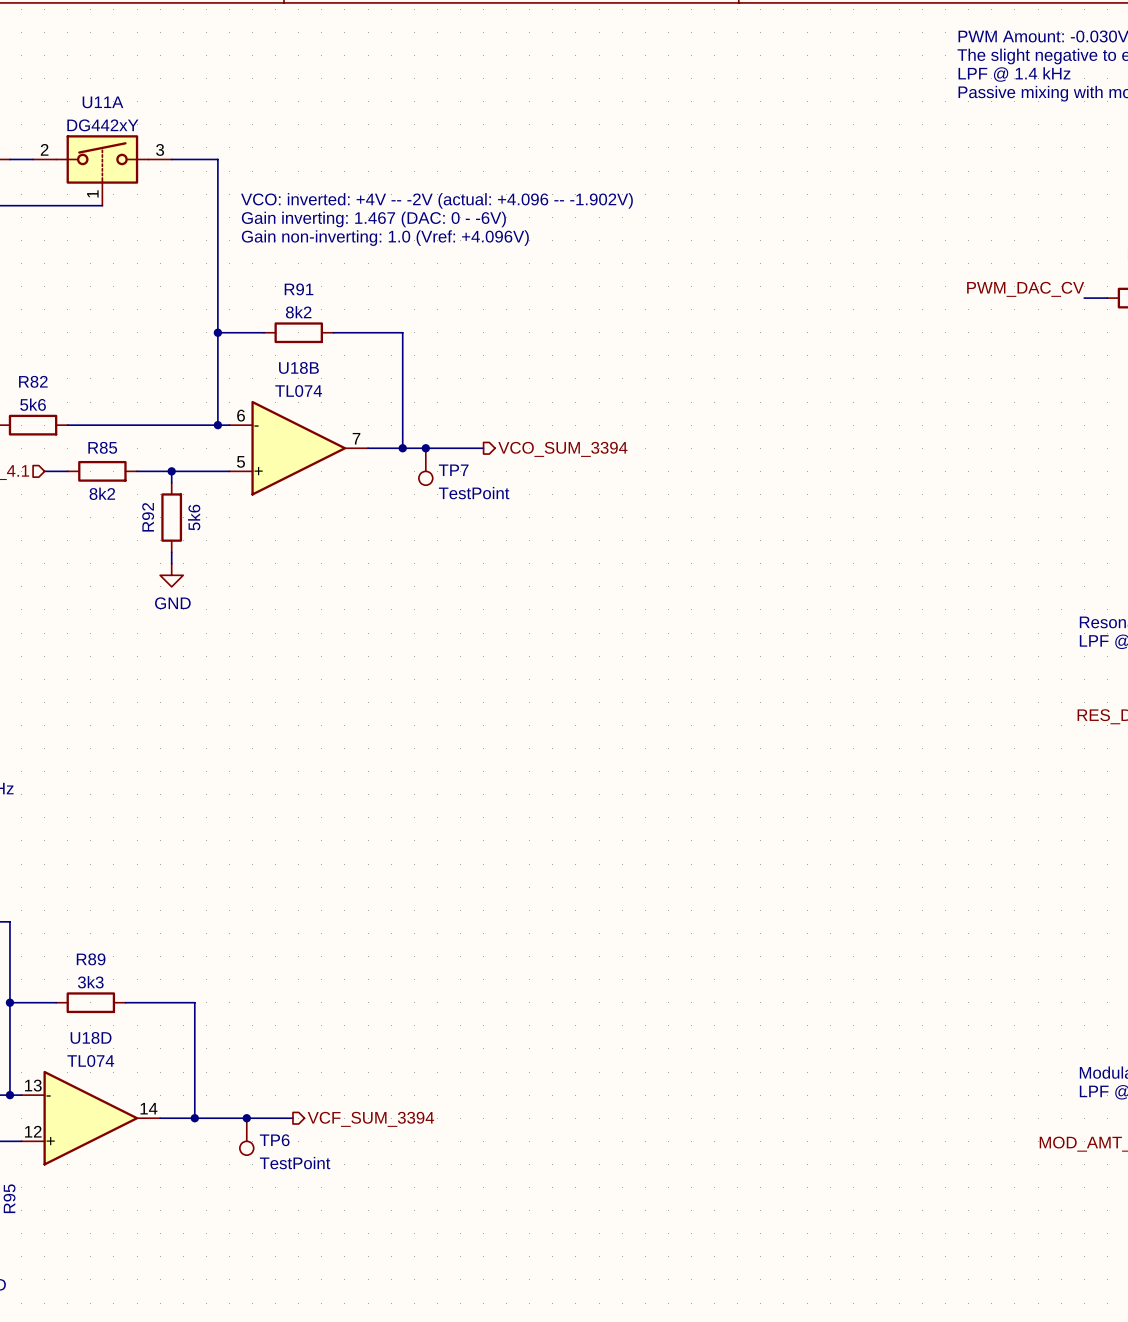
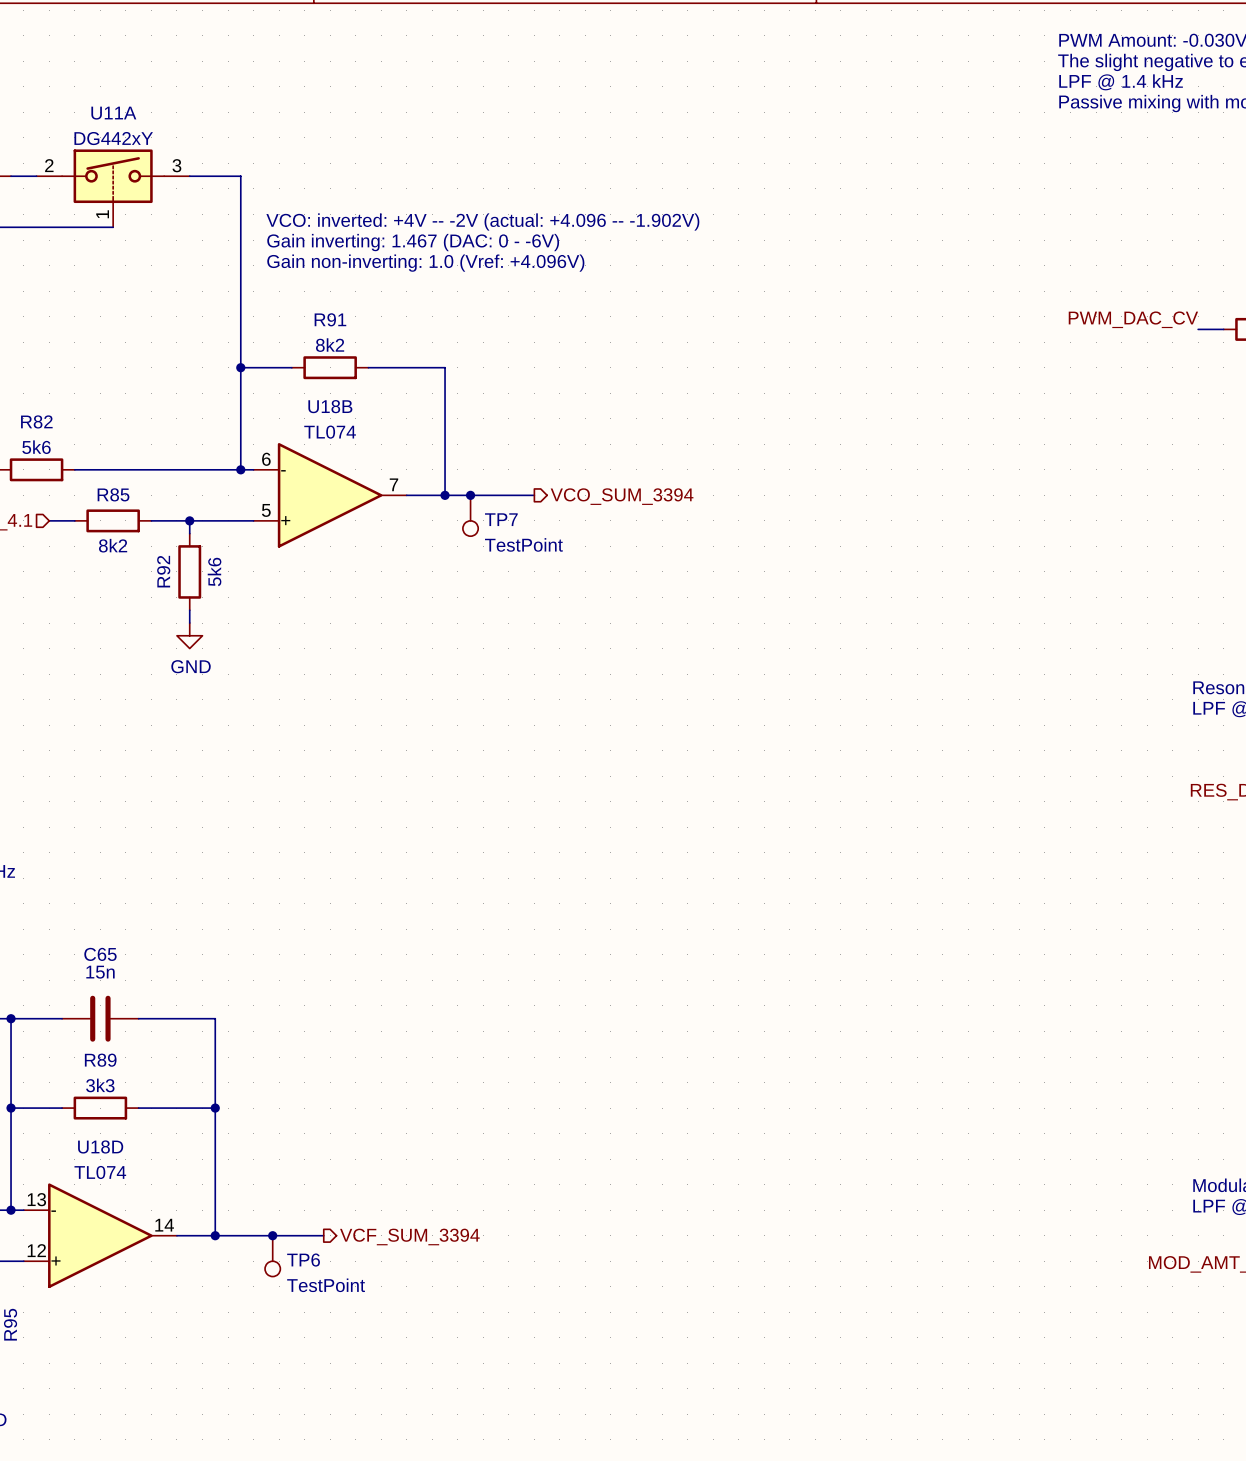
wire: none -> (11, 1018) (62, 1018)
junction: none -> (11, 1018)
C65: none -> 15n (100, 1018)
wire: none -> (138, 1018) (215, 1018) (215, 1108)
junction: none -> (215, 1108)

